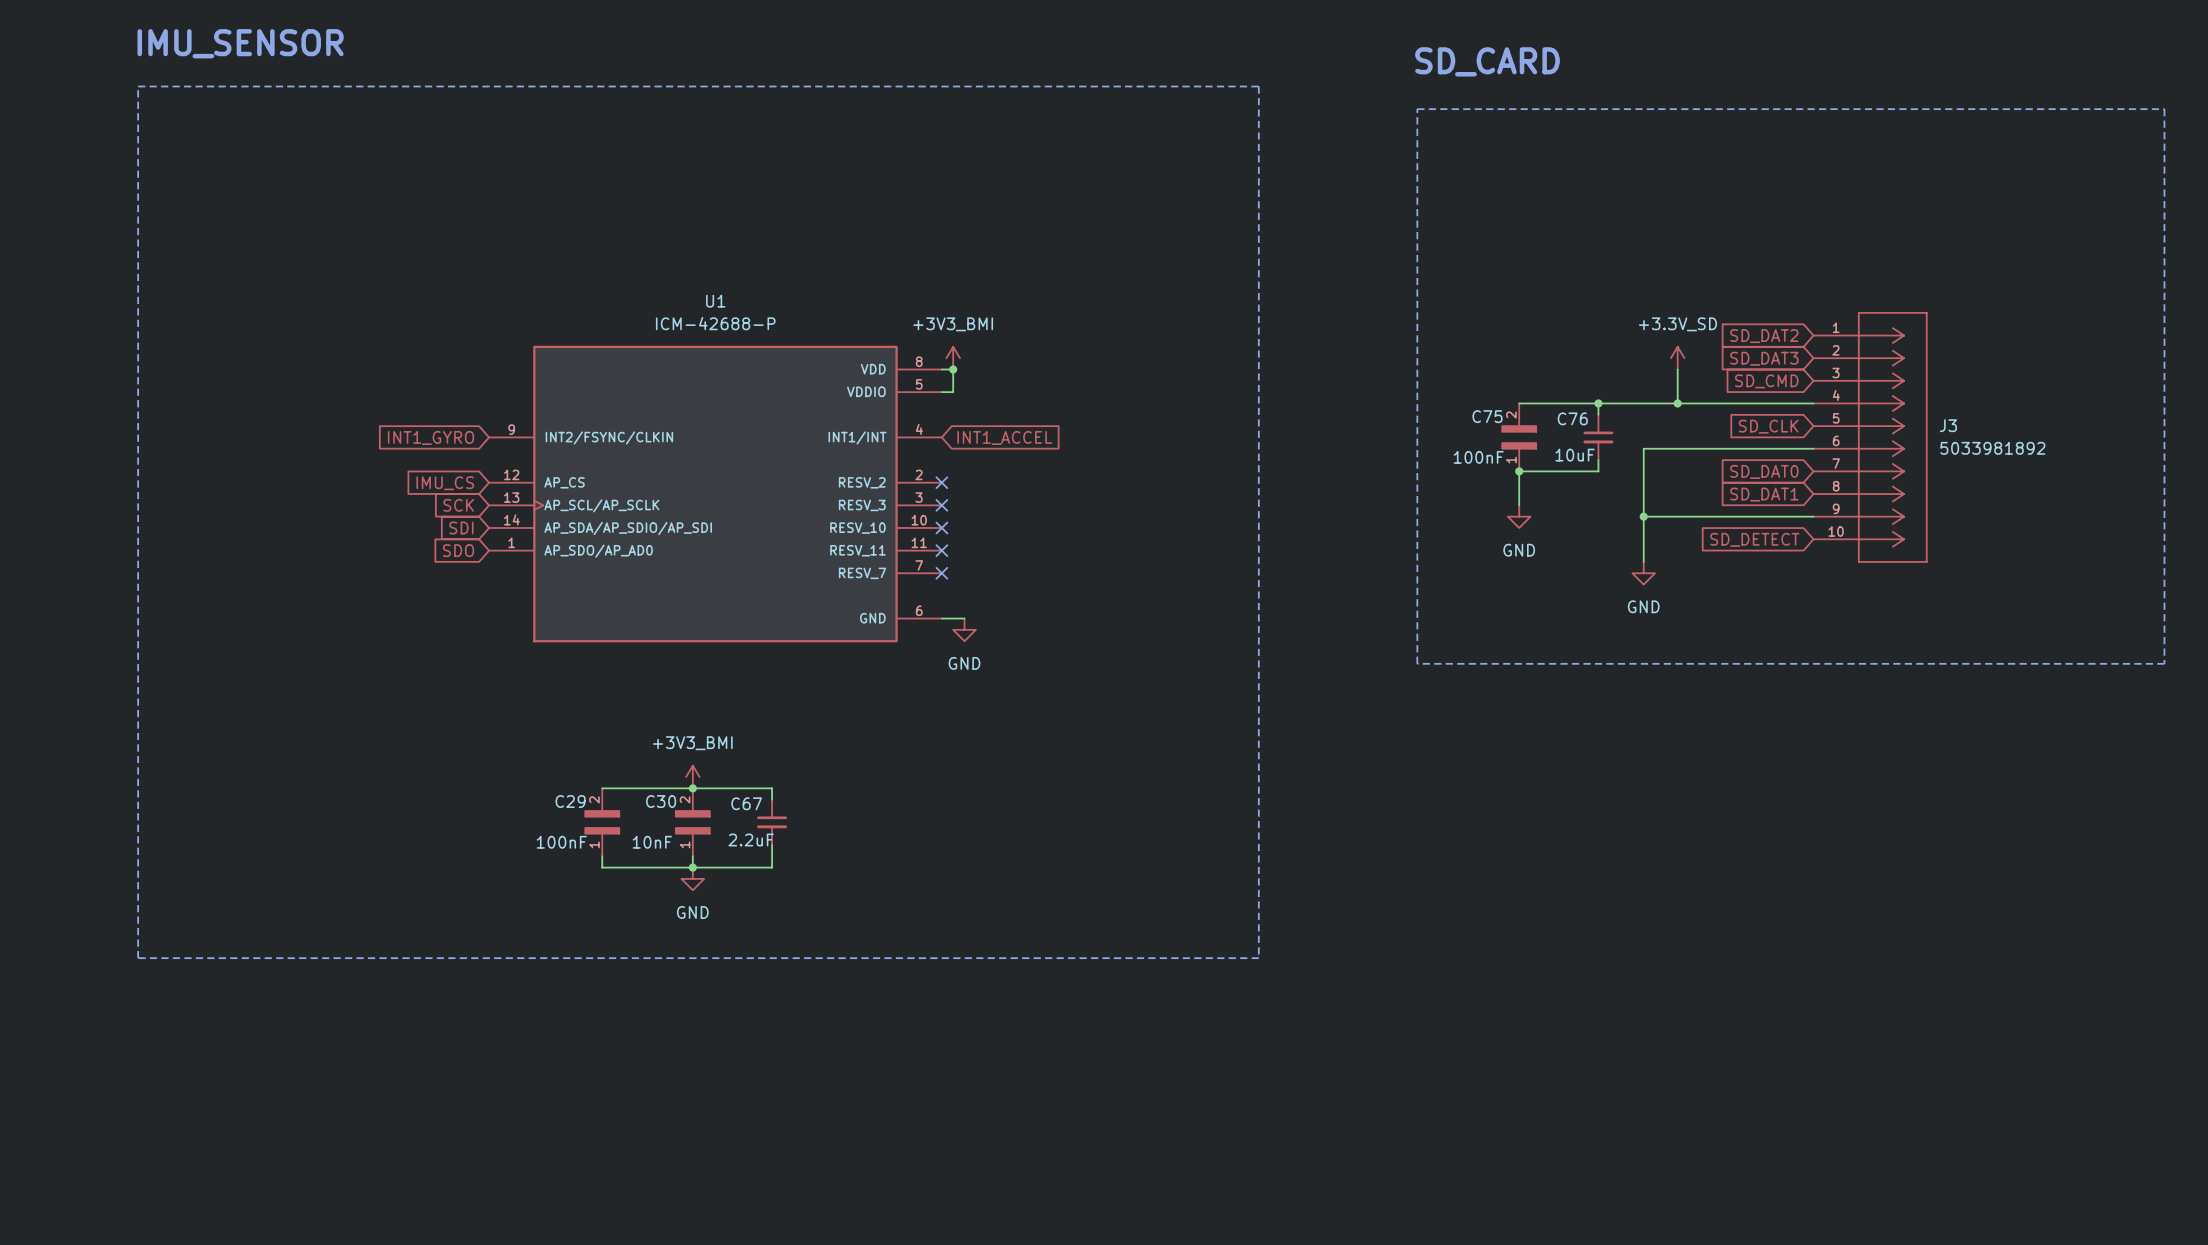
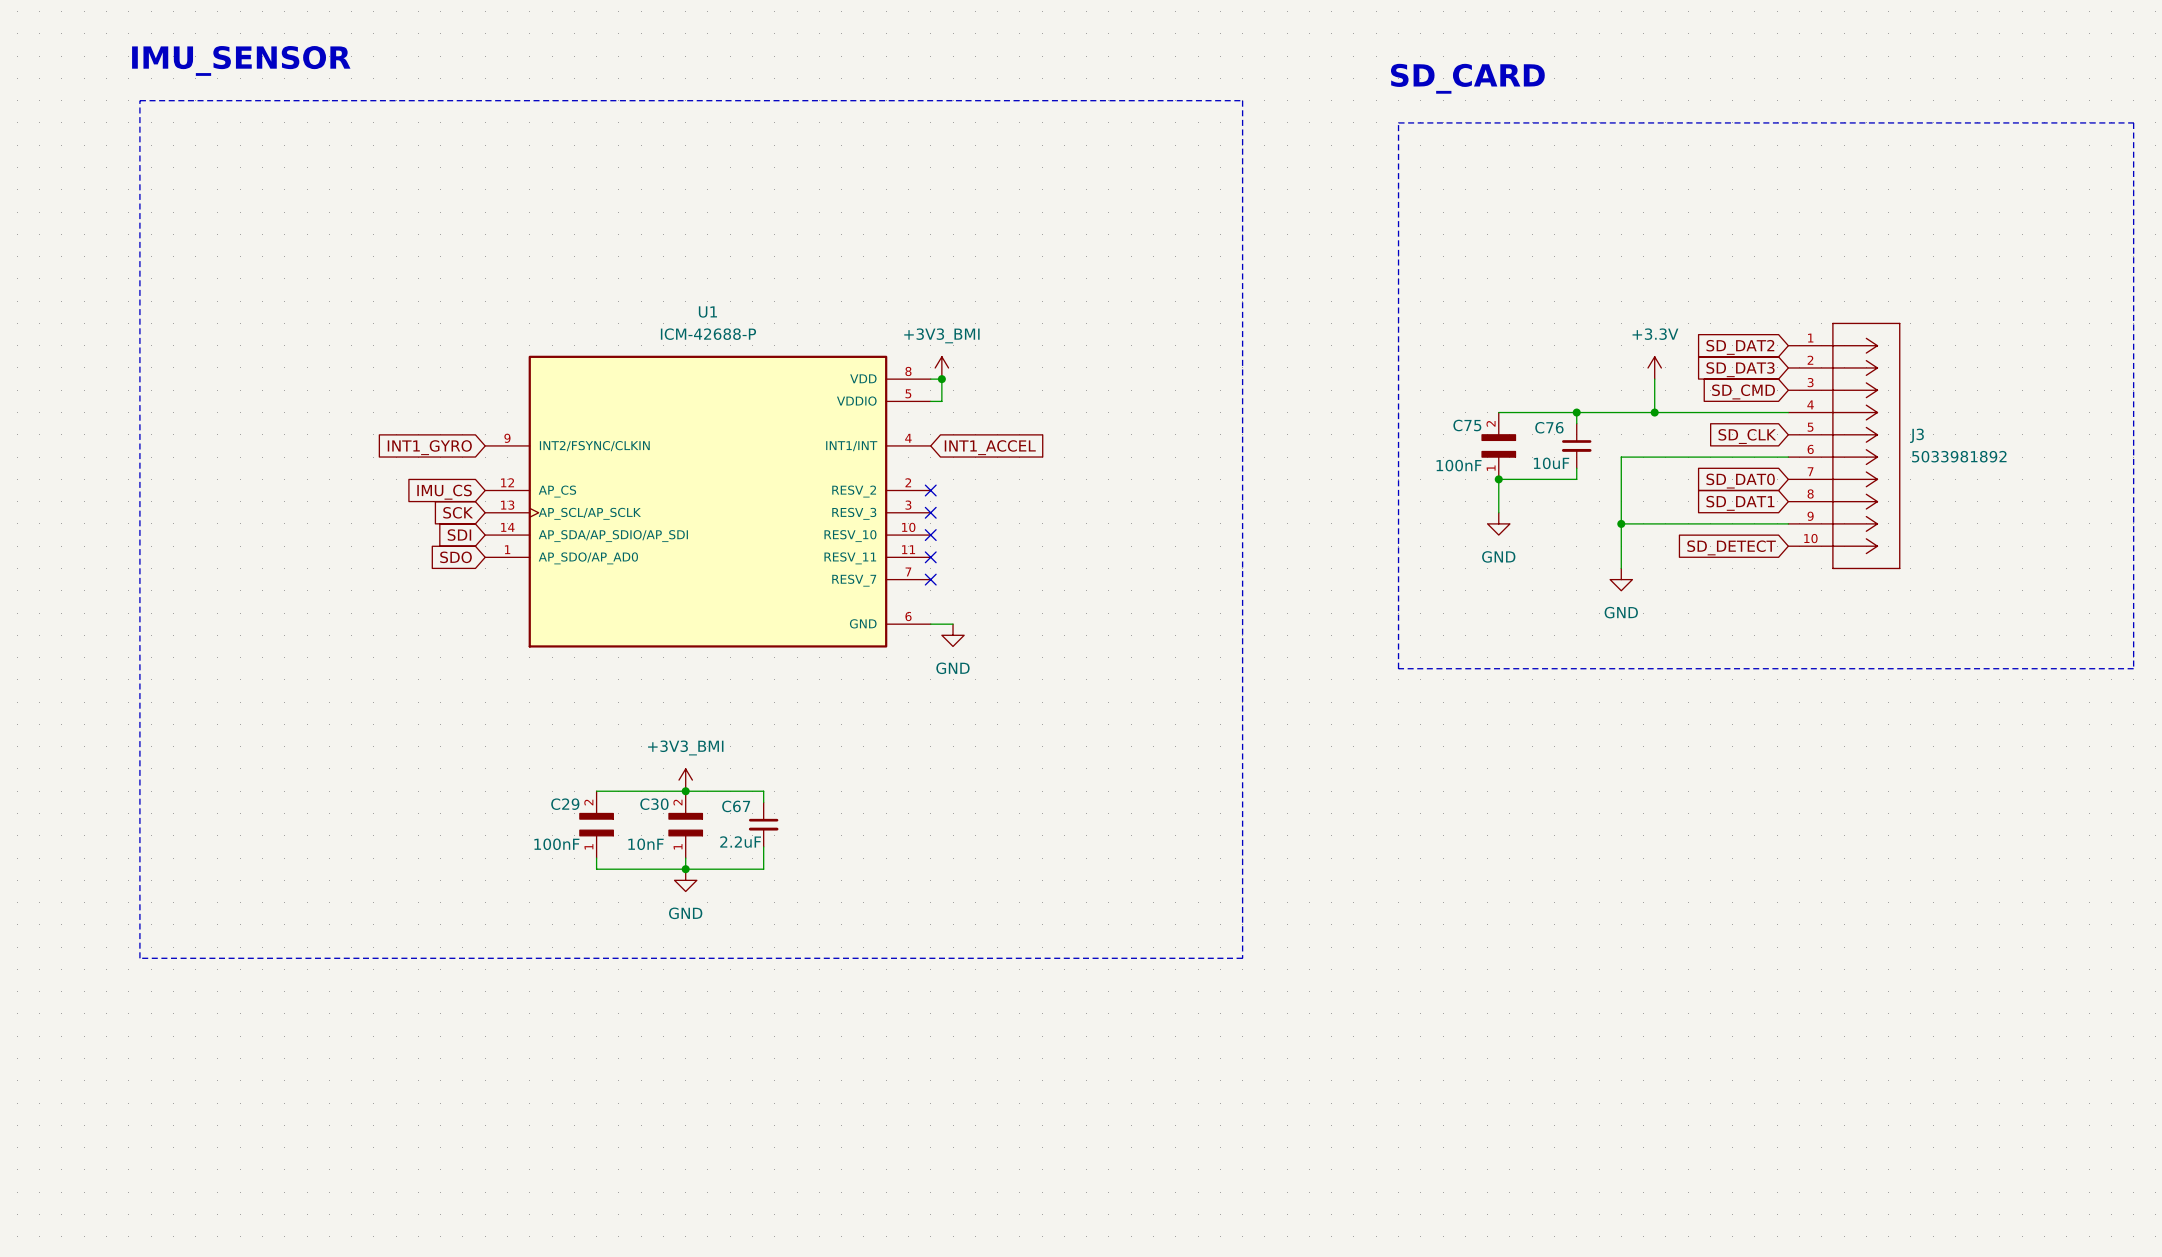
power symbol: +3.3V_SD (1677, 358) -> +3.3V (1654, 367)

